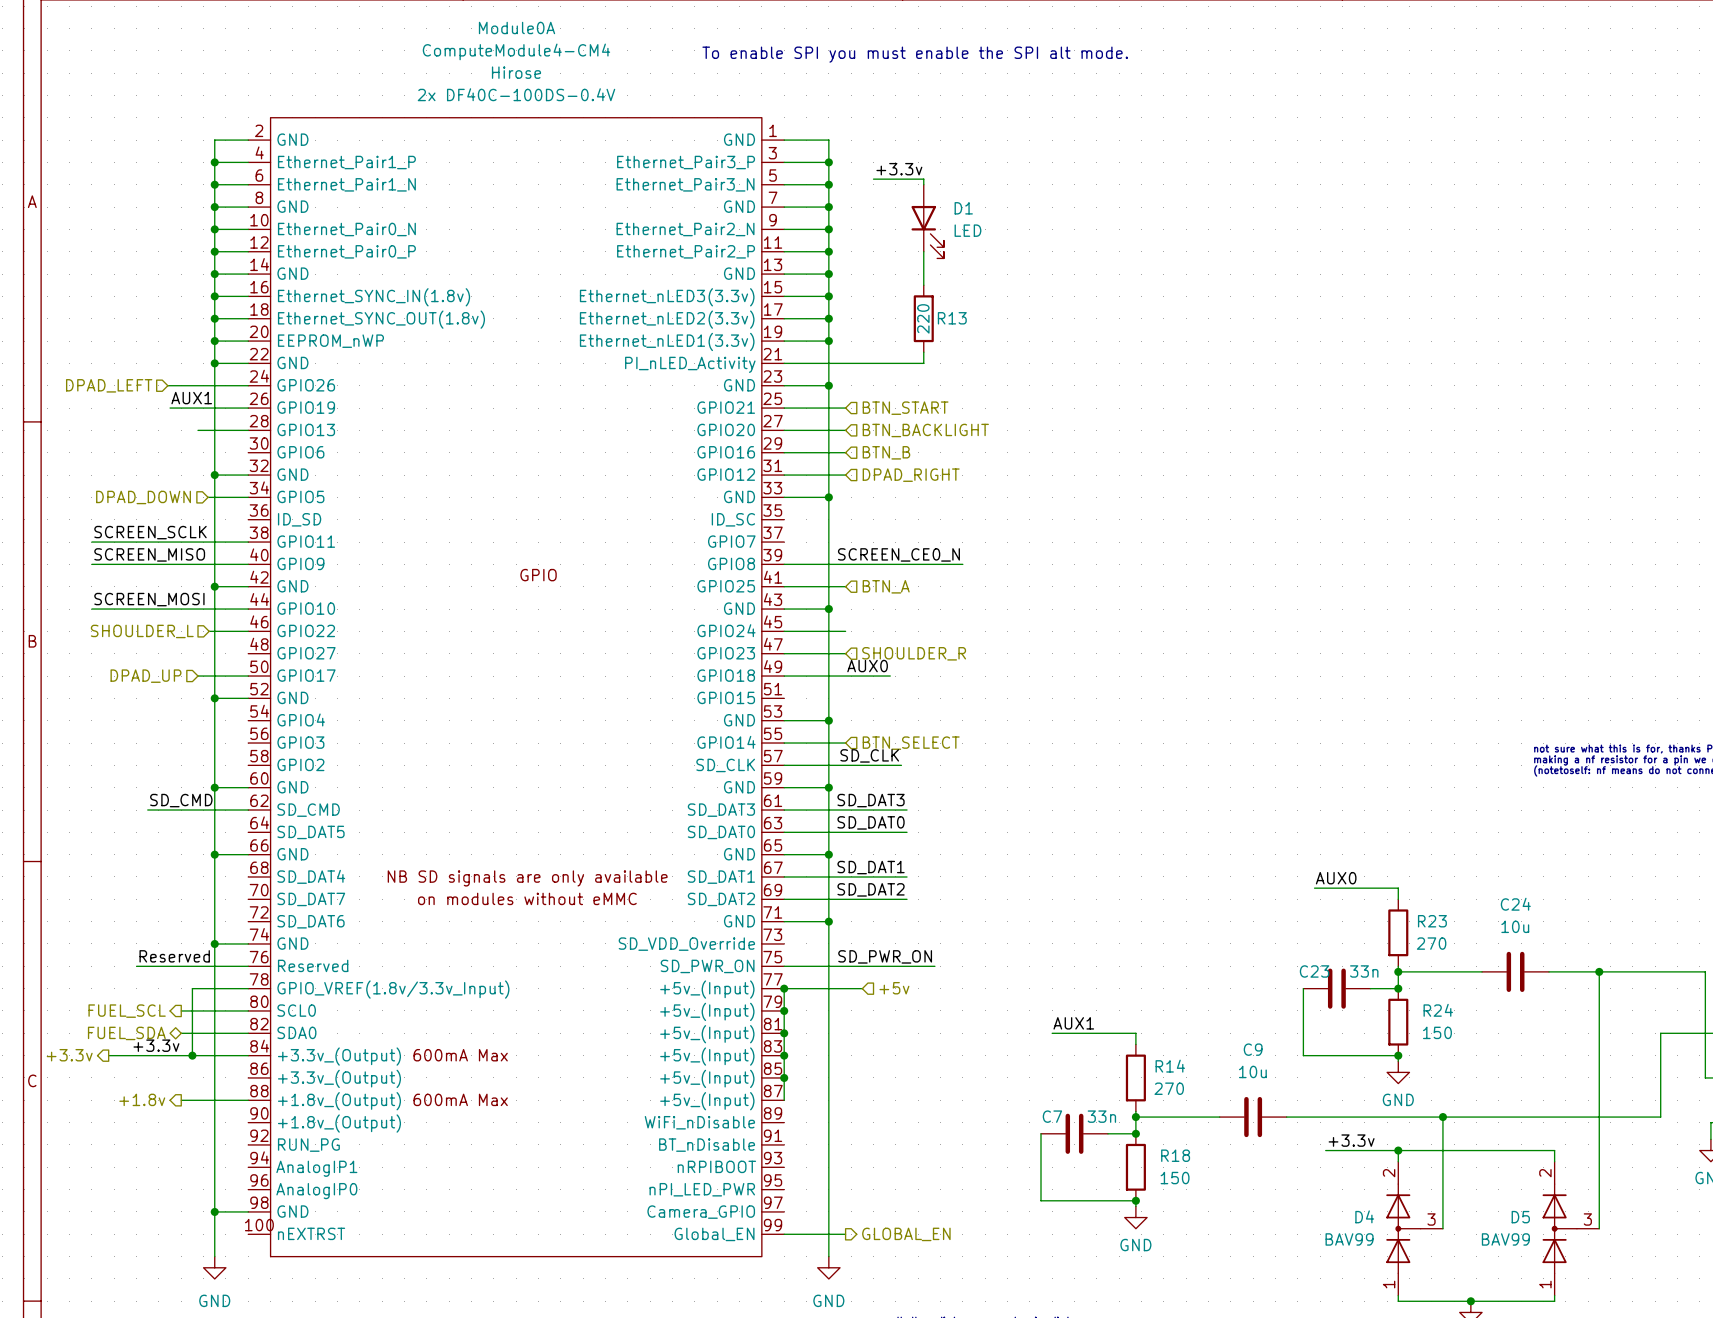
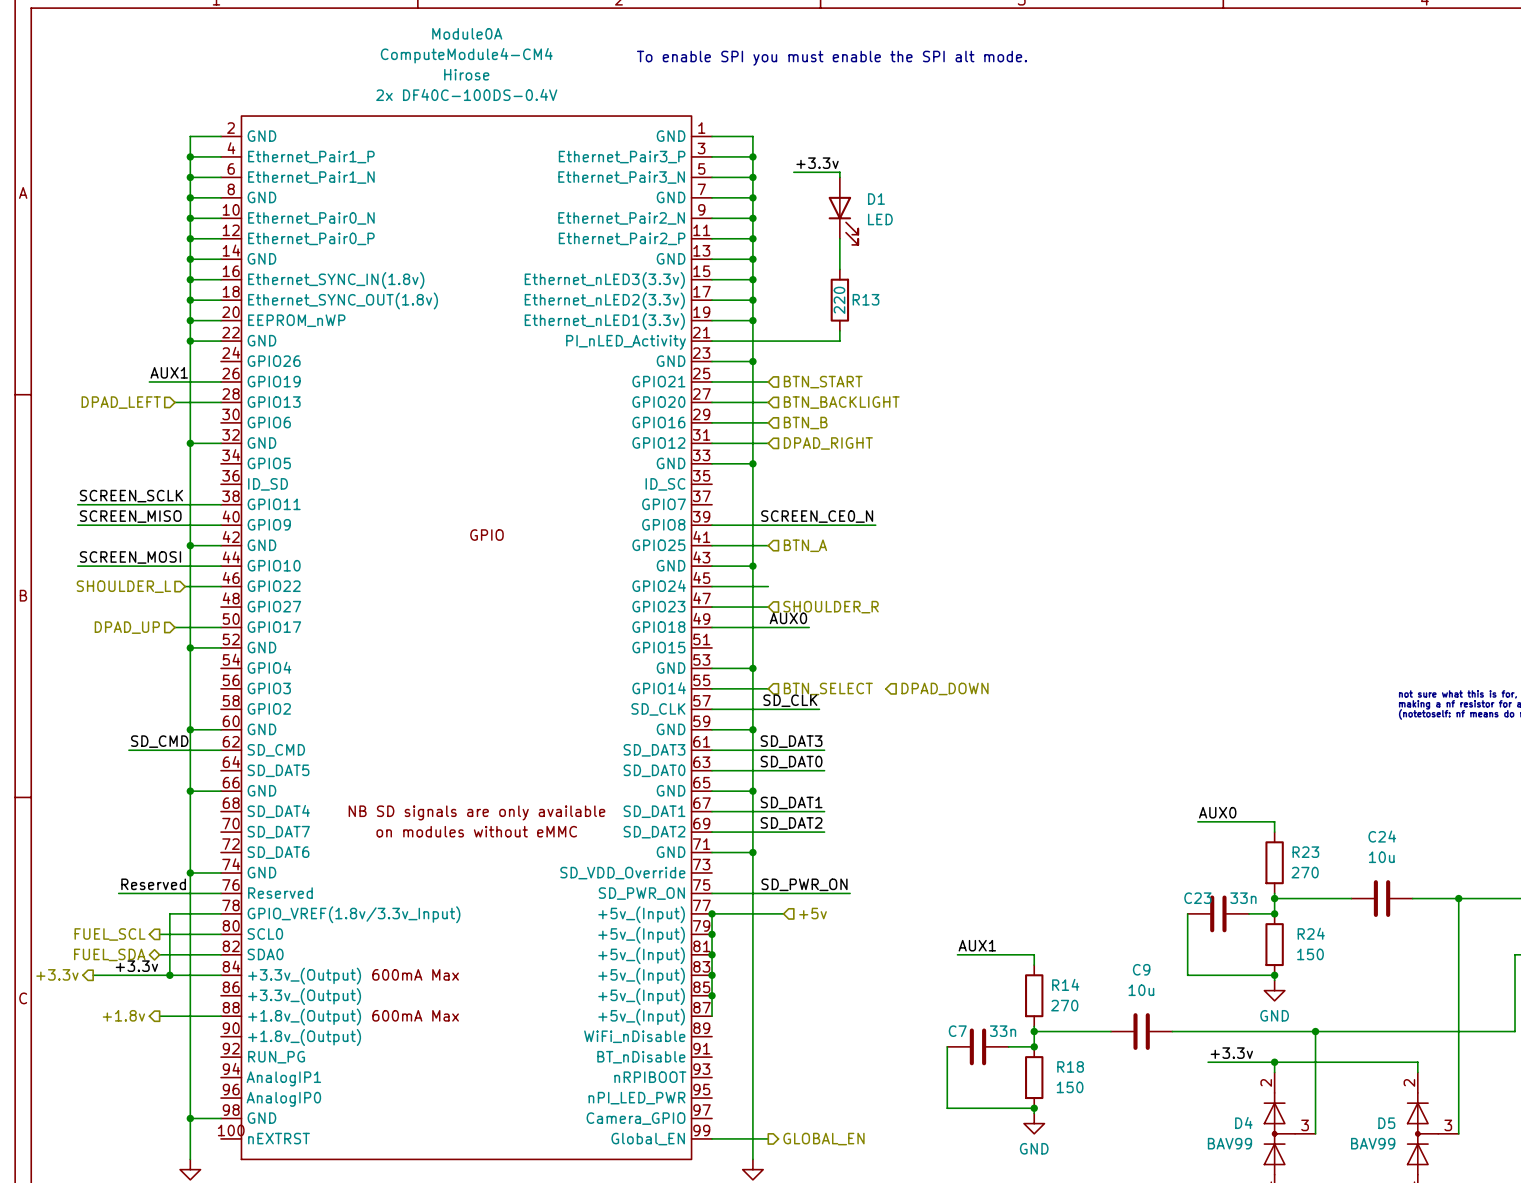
hierarchical label position: DPAD_LEFT (109, 385) -> DPAD_LEFT (121, 402)
wire: (167, 385) (248, 385) -> none
hierarchical label: DPAD_DOWN (143, 497) -> none
wire: (208, 497) (248, 497) -> none
hierarchical label: none -> DPAD_DOWN (945, 688)

